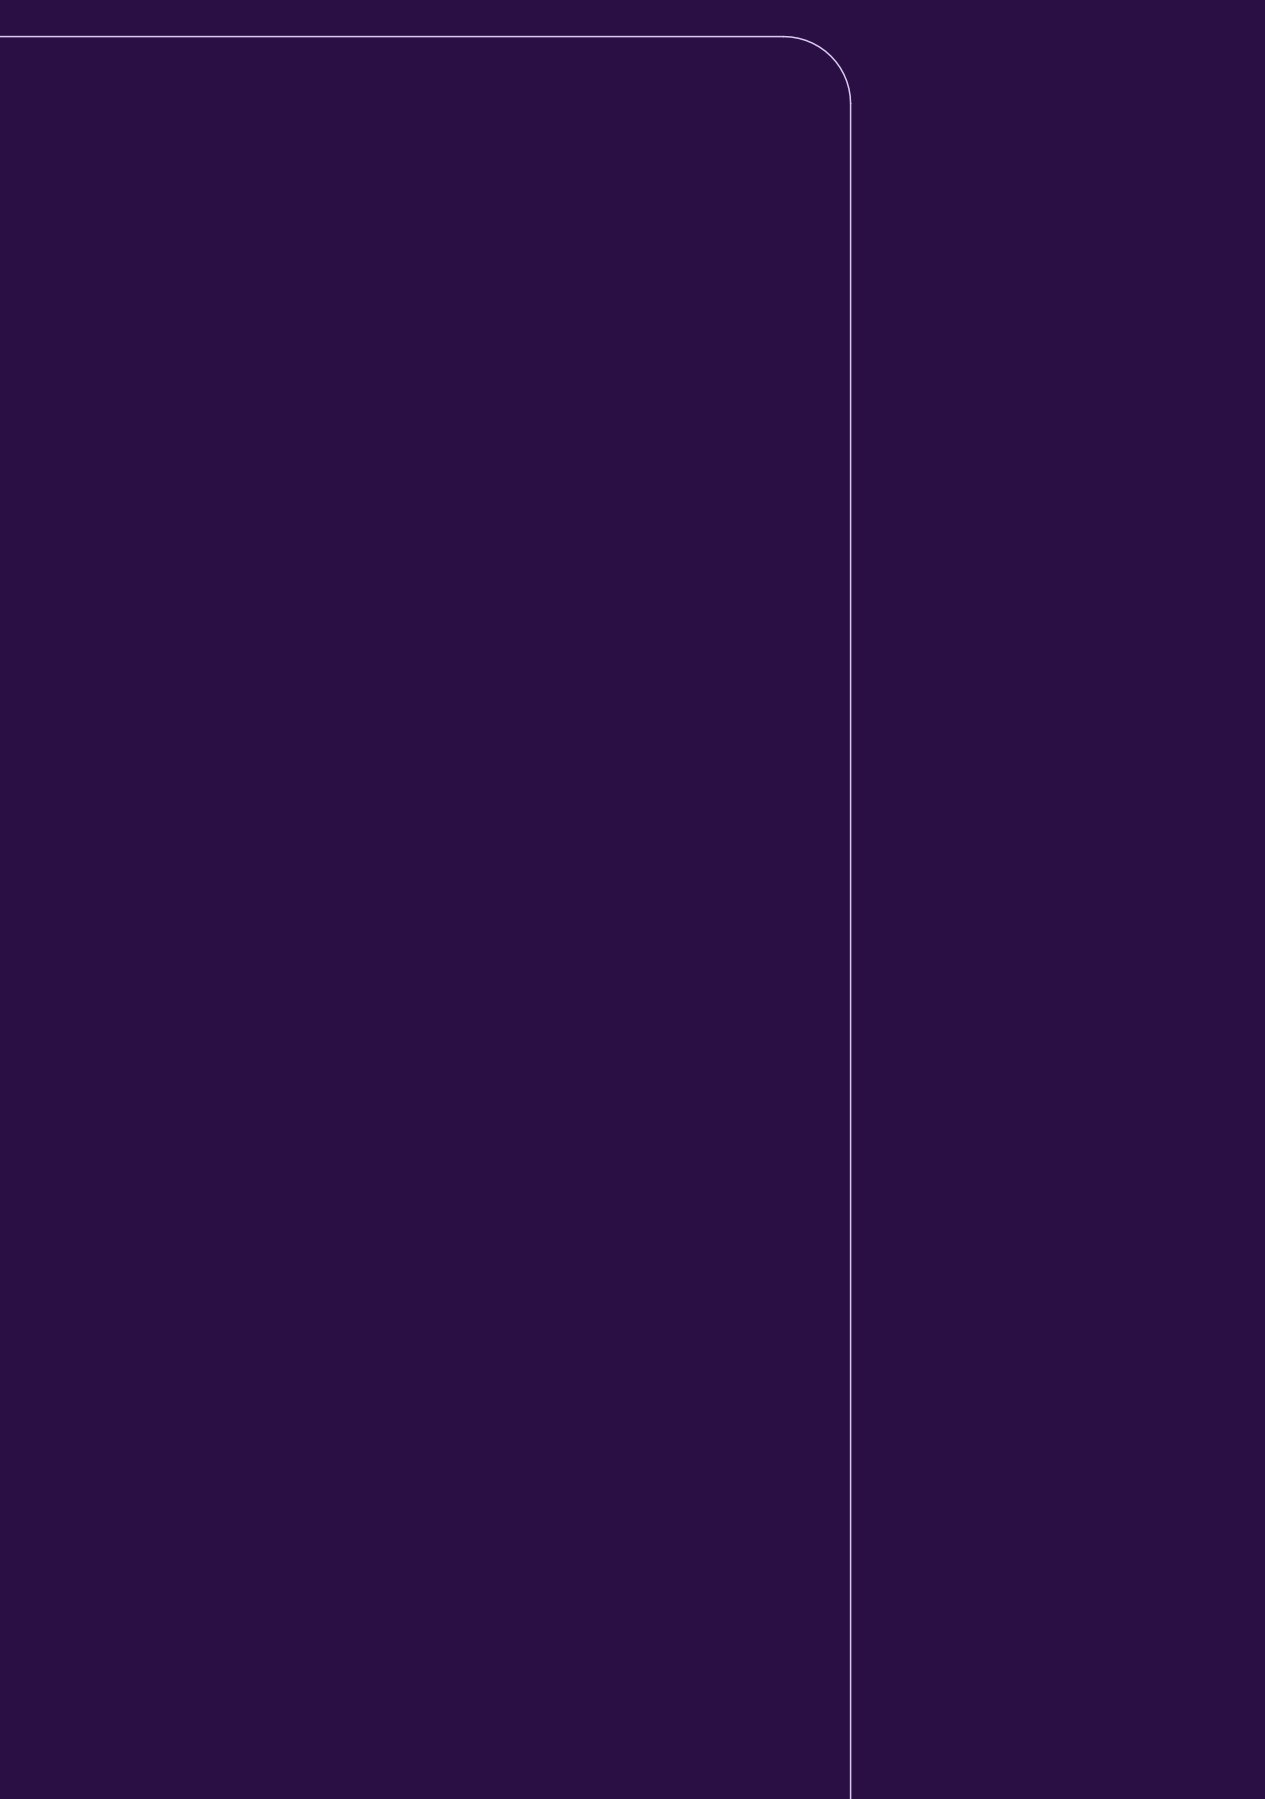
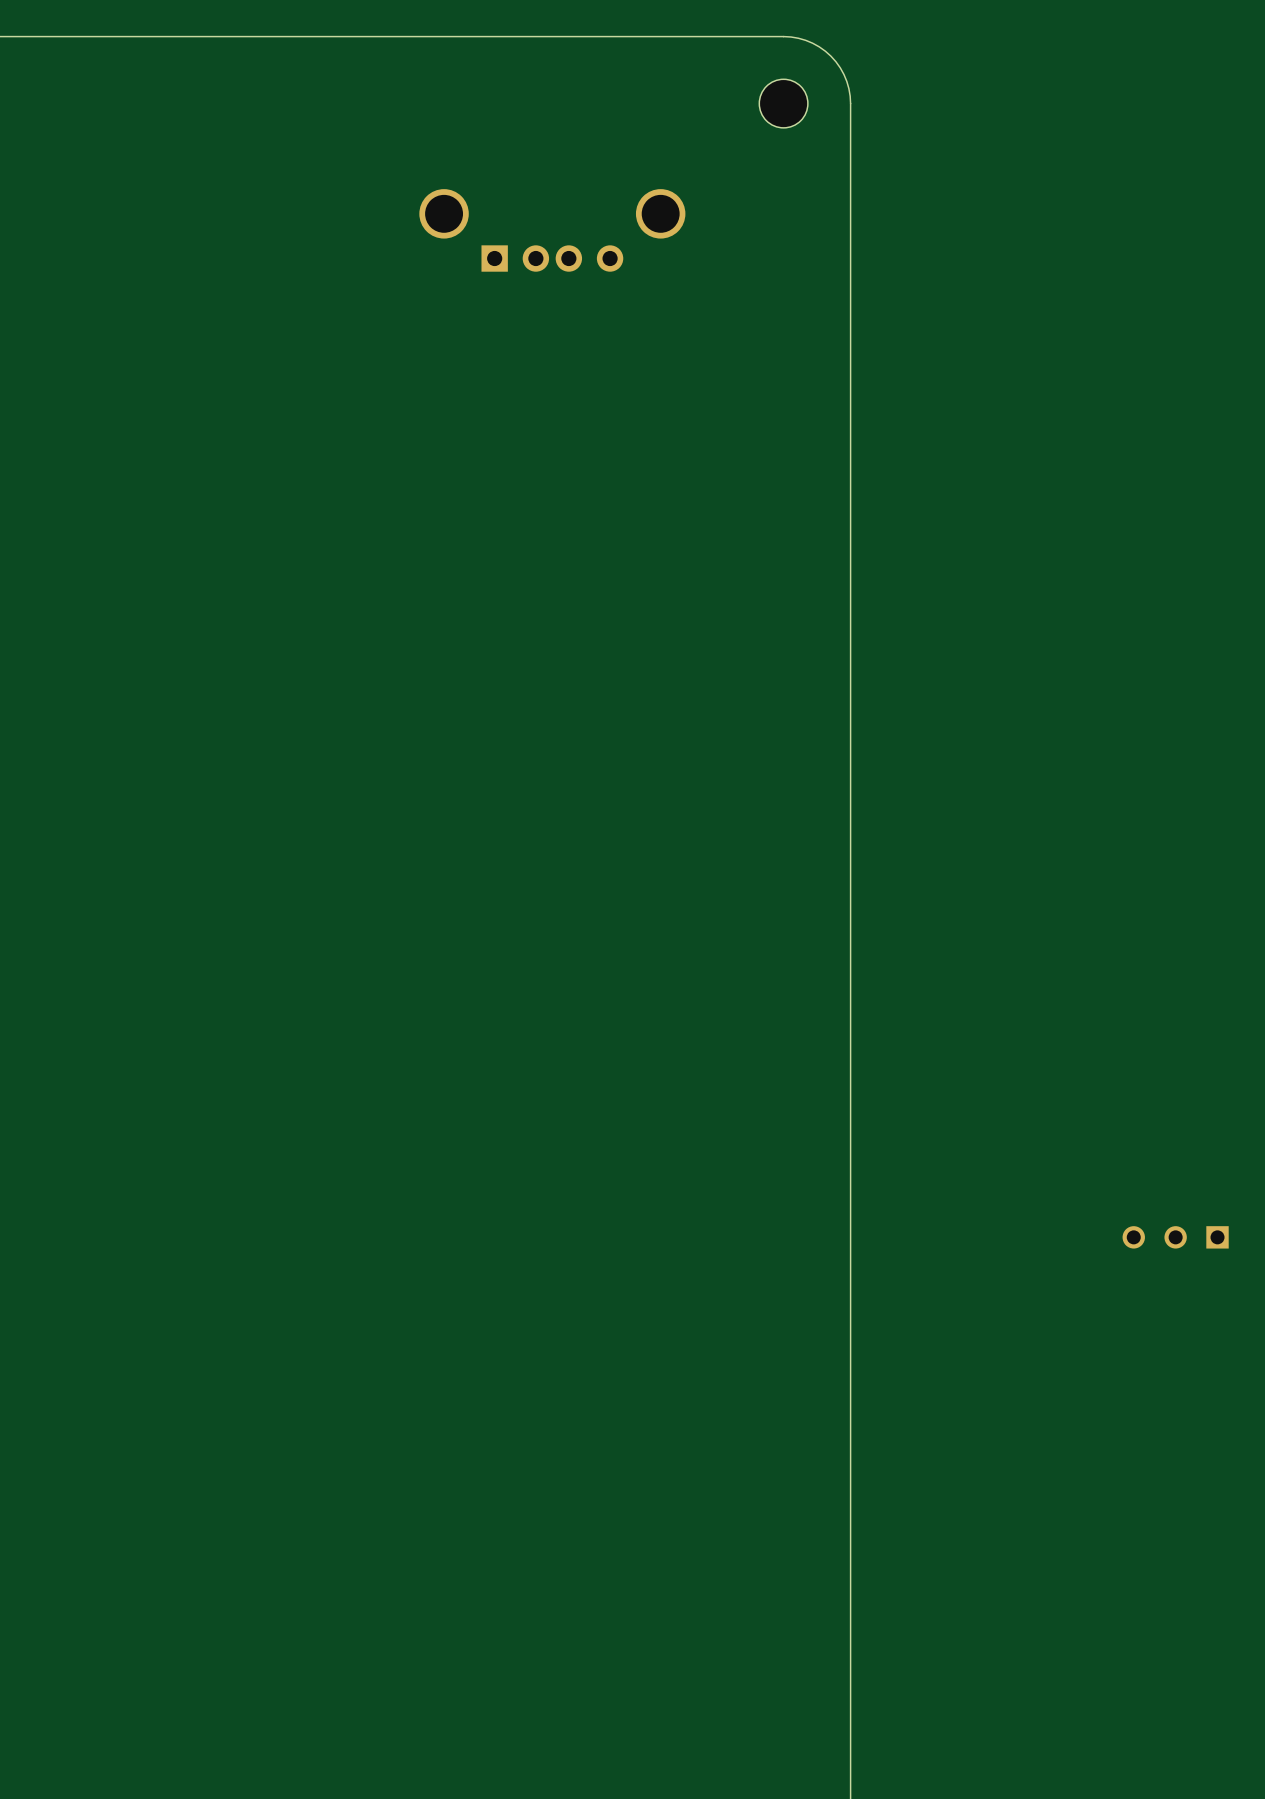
part: none -> (783, 103)
part: none -> (552, 230)
part: none -> (1175, 1237)

